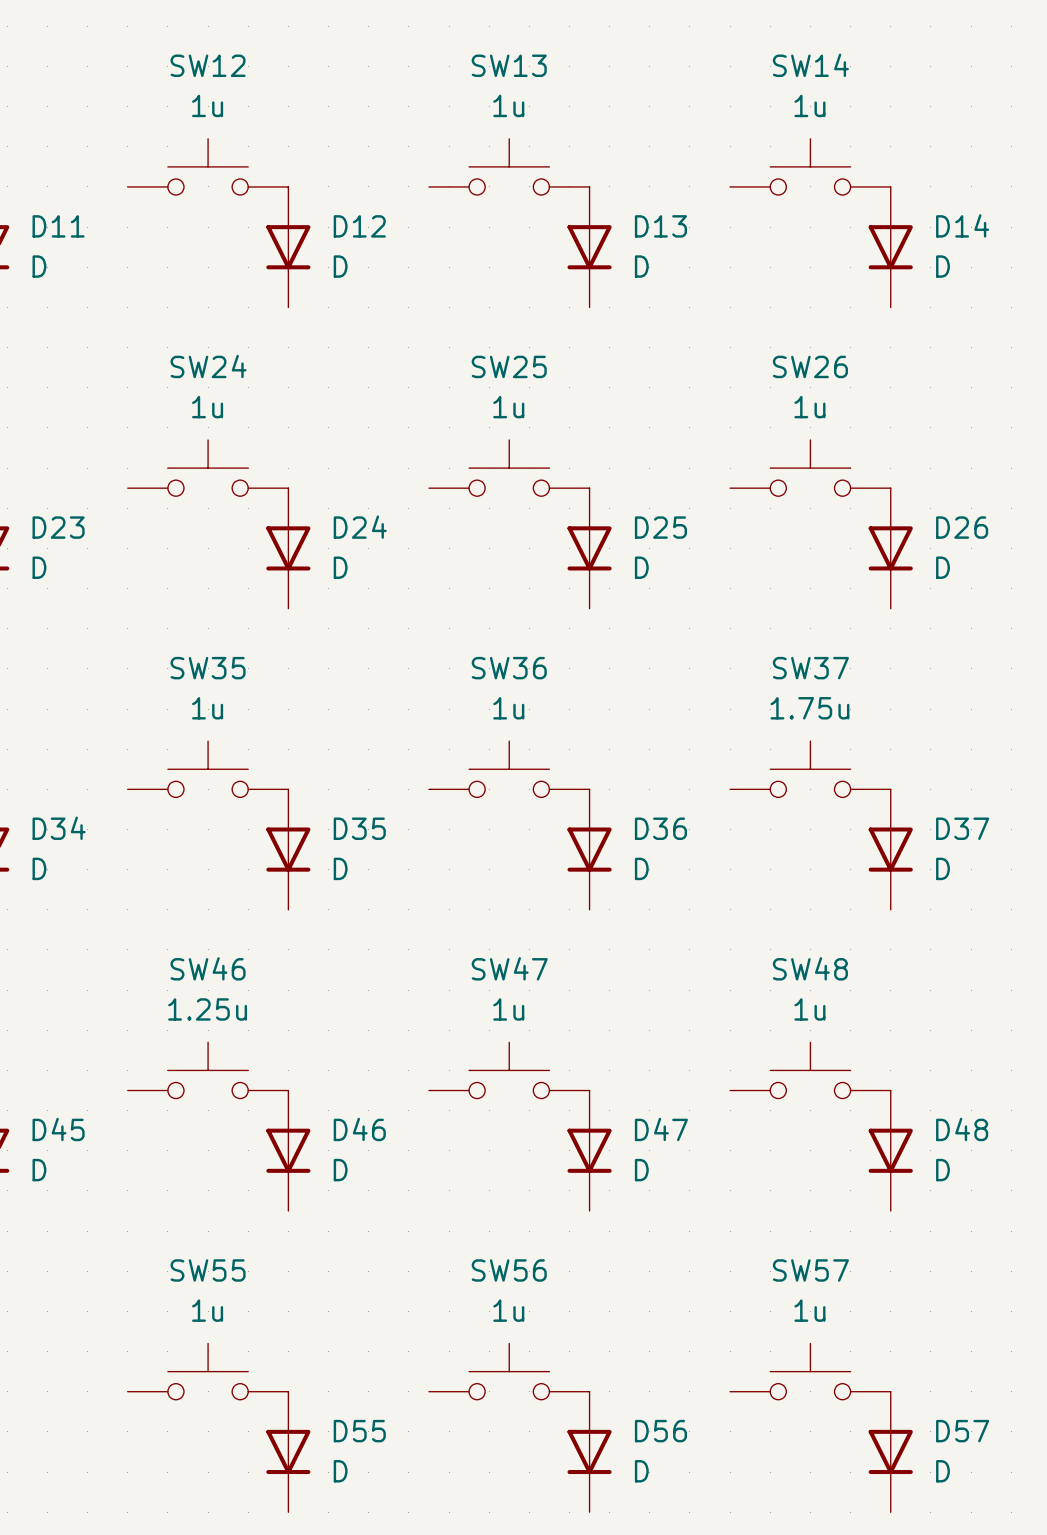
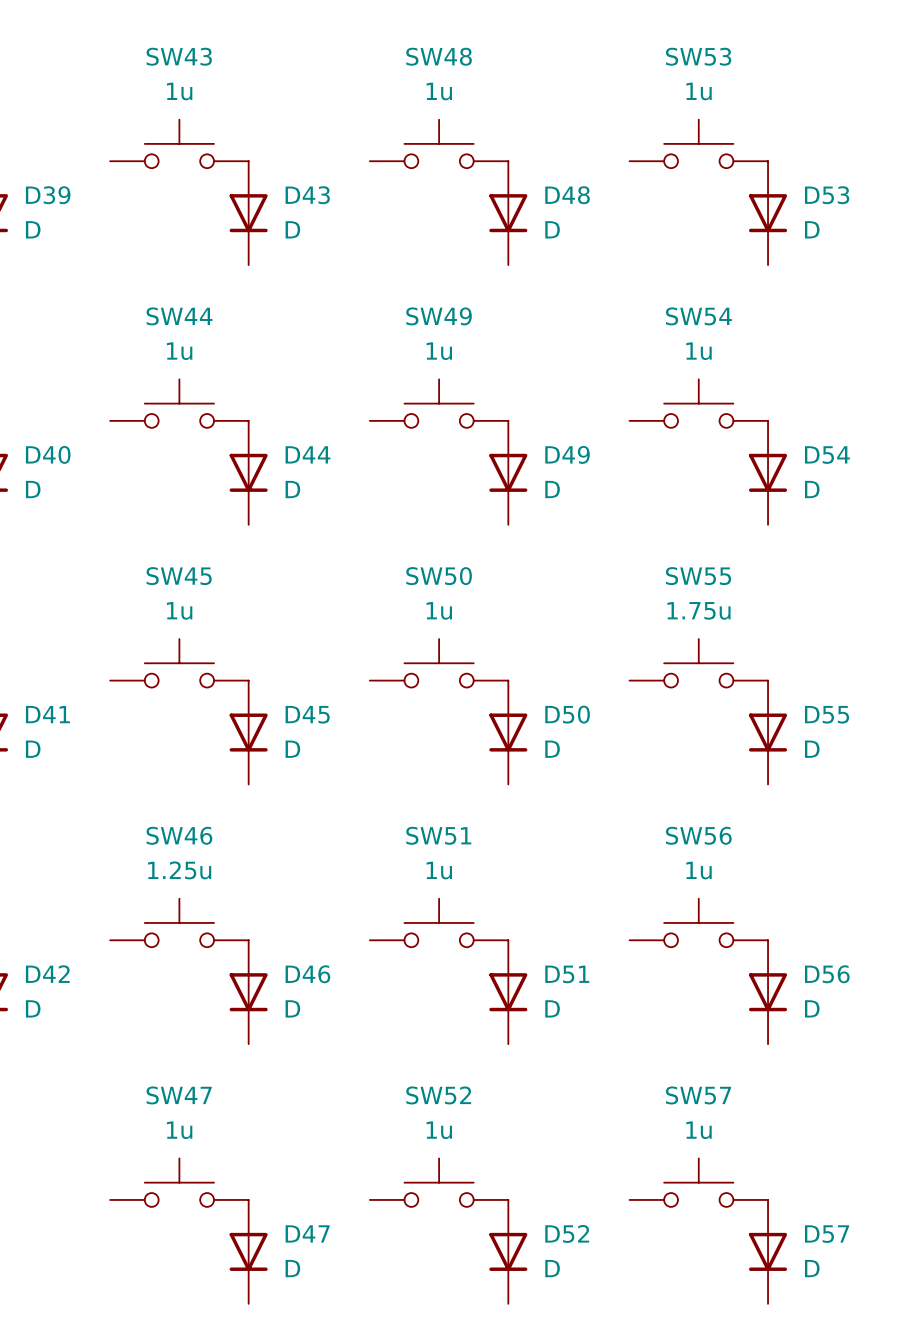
SW12 name: SW12 (208, 65) -> SW43 (179, 56)
SW13 name: SW13 (509, 65) -> SW48 (439, 56)
SW14 name: SW14 (810, 65) -> SW53 (698, 56)
D14 name: D14 (962, 225) -> D53 (827, 195)
D11 name: D11 (58, 226) -> D39 (48, 195)
D12 name: D12 (359, 226) -> D43 (307, 195)
D13 name: D13 (660, 226) -> D48 (567, 195)
SW24 name: SW24 (208, 366) -> SW44 (179, 316)
SW25 name: SW25 (509, 366) -> SW49 (439, 316)
SW26 name: SW26 (810, 366) -> SW54 (698, 316)
D23 name: D23 (58, 527) -> D40 (48, 454)
D24 name: D24 (360, 527) -> D44 (308, 454)
D25 name: D25 (660, 527) -> D49 (567, 454)
D26 name: D26 (962, 527) -> D54 (827, 455)
SW35 name: SW35 (208, 668) -> SW45 (179, 576)
SW36 name: SW36 (509, 668) -> SW50 (439, 576)
SW37 name: SW37 (810, 668) -> SW55 (698, 576)
D34 name: D34 (59, 828) -> D41 (47, 714)
D35 name: D35 (359, 828) -> D45 (307, 714)
D36 name: D36 (660, 828) -> D50 (567, 714)
D37 name: D37 (962, 828) -> D55 (827, 714)
SW47 name: SW47 (509, 968) -> SW51 (438, 835)
SW48 name: SW48 (810, 968) -> SW56 (698, 835)
D45 name: D45 (58, 1129) -> D42 (47, 974)
D47 name: D47 (661, 1129) -> D51 (567, 974)
D48 name: D48 (962, 1129) -> D56 (827, 974)
SW55 name: SW55 (208, 1270) -> SW47 (179, 1095)
SW56 name: SW56 (509, 1270) -> SW52 (438, 1095)
D55 name: D55 (359, 1431) -> D47 (307, 1233)
D56 name: D56 (660, 1431) -> D52 (567, 1233)

